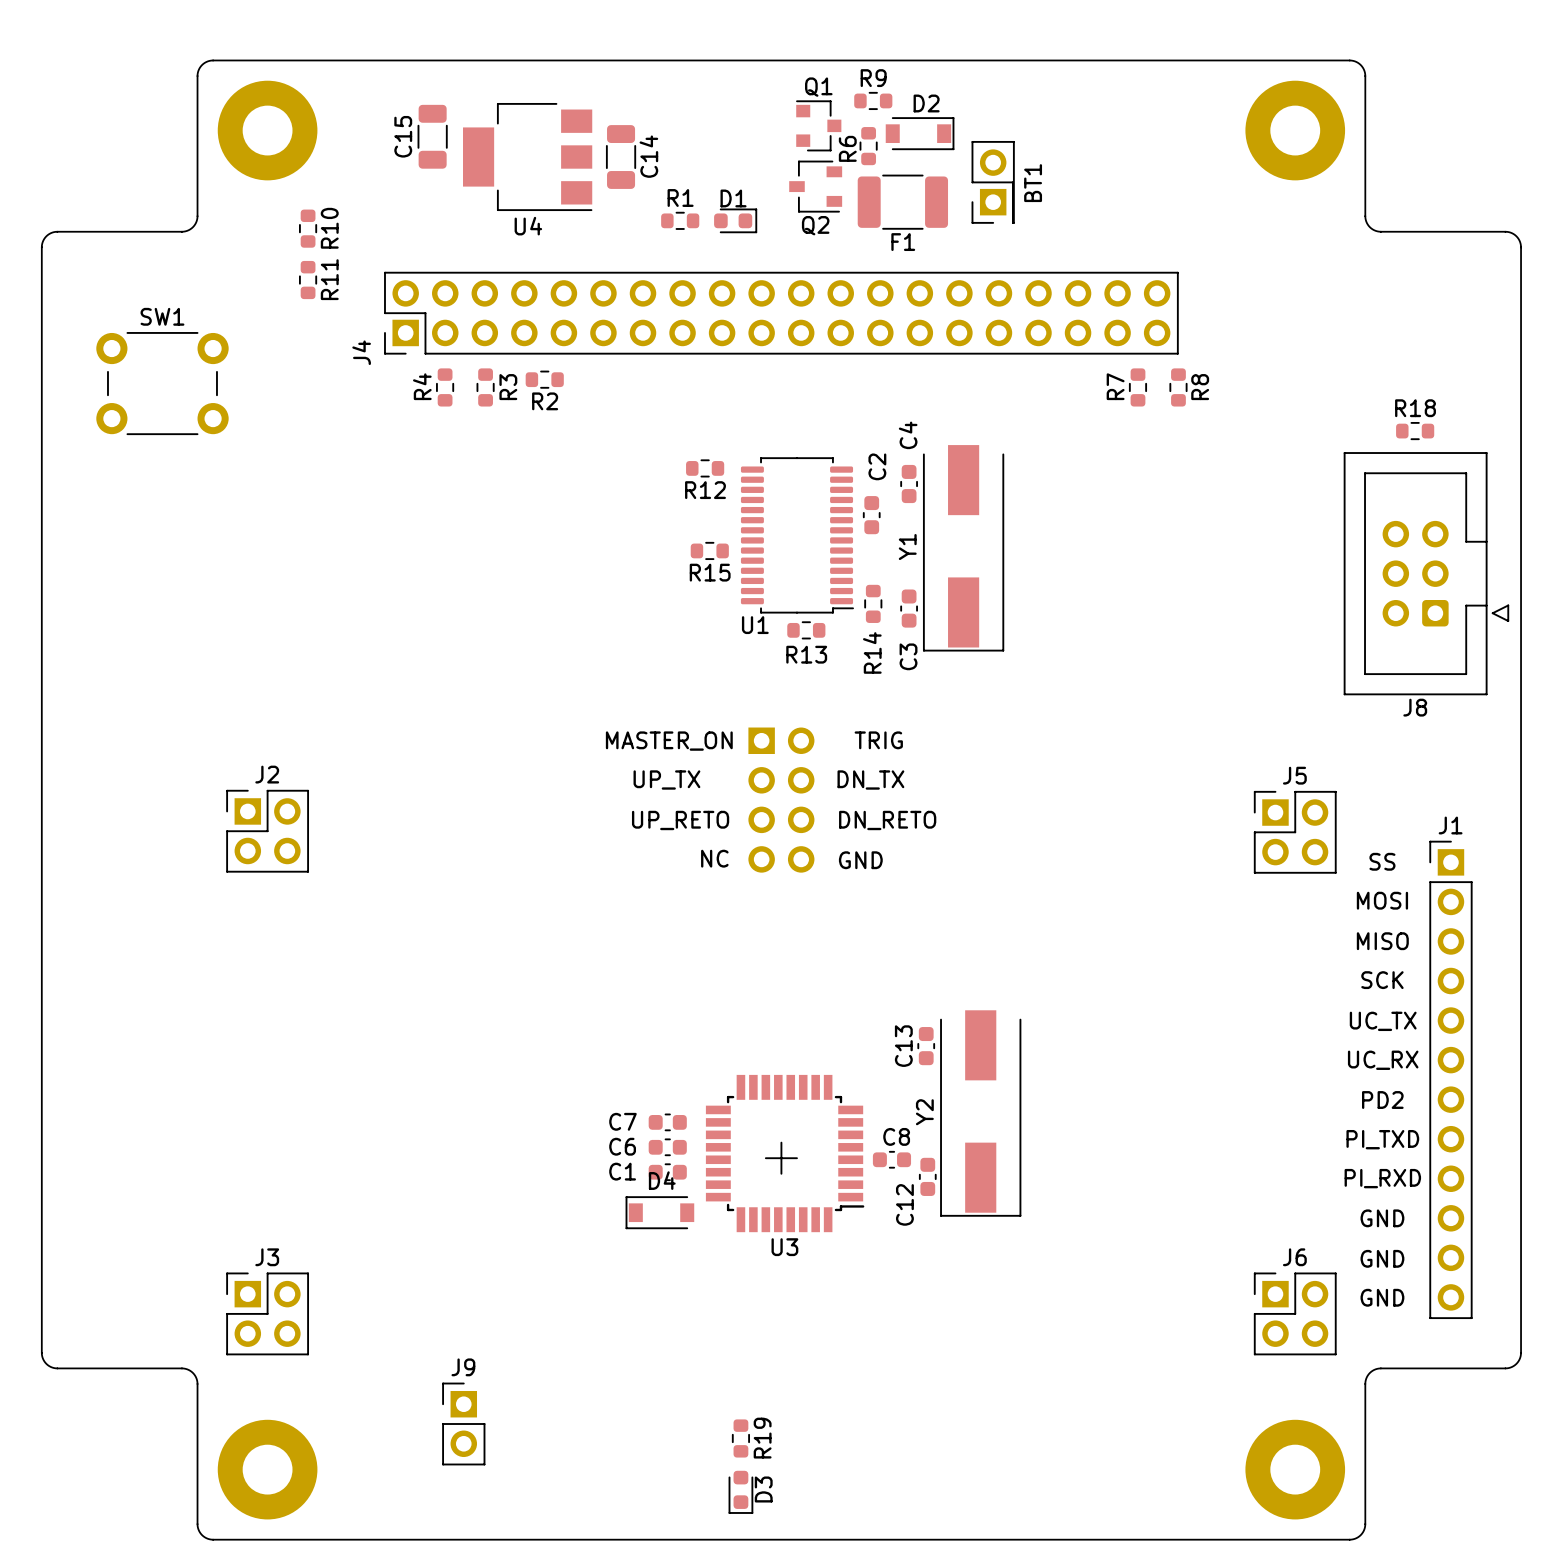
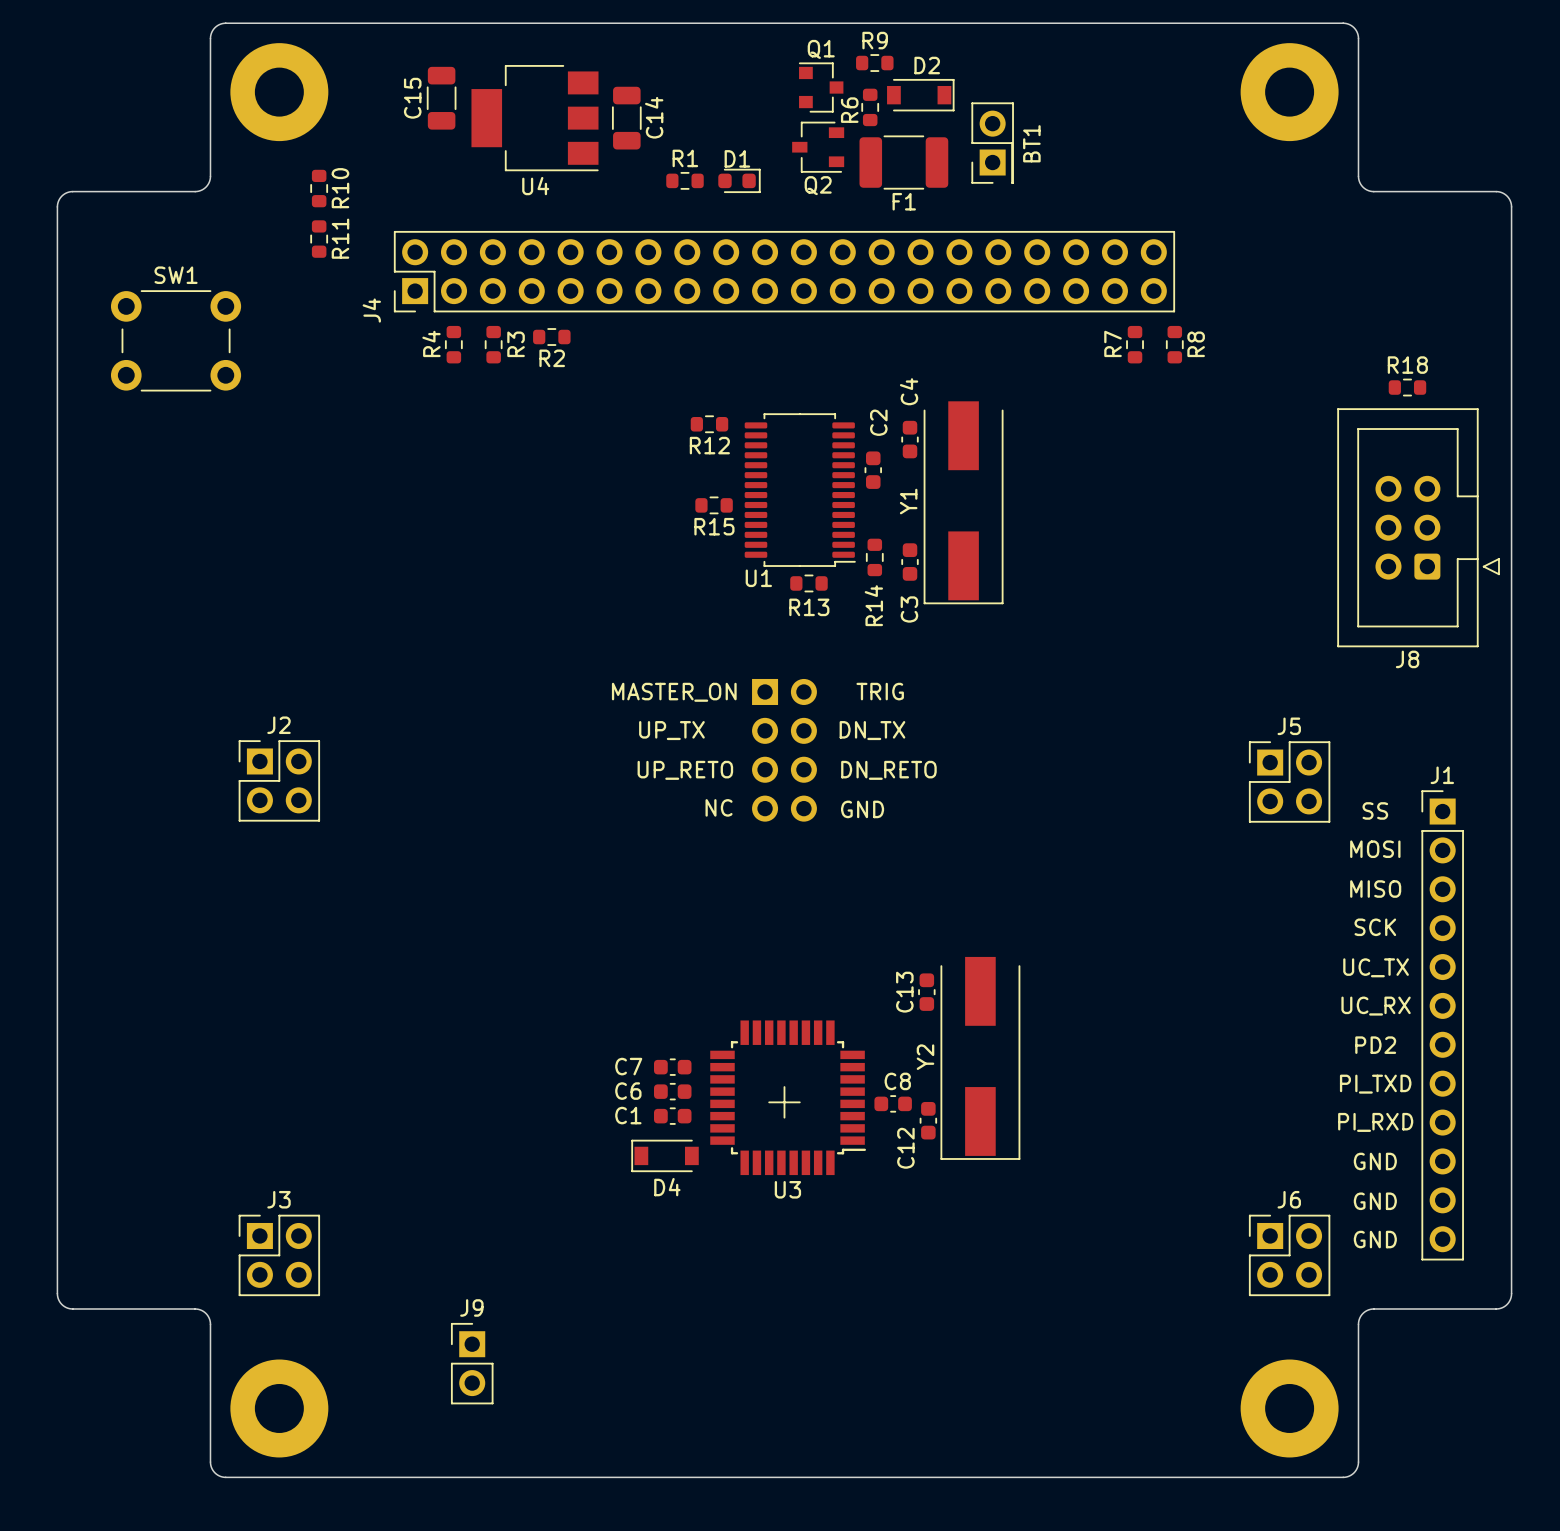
D4 name position: D4 (662, 1180) -> D4 (667, 1187)
R19: (740, 1438) -> none
D3: (740, 1492) -> none

